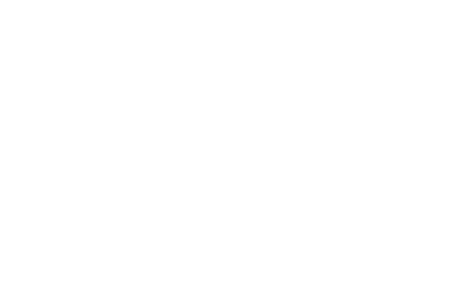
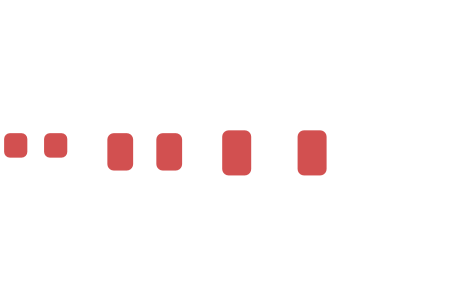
part: none -> (35, 145)
part: none -> (144, 151)
part: none -> (274, 152)

